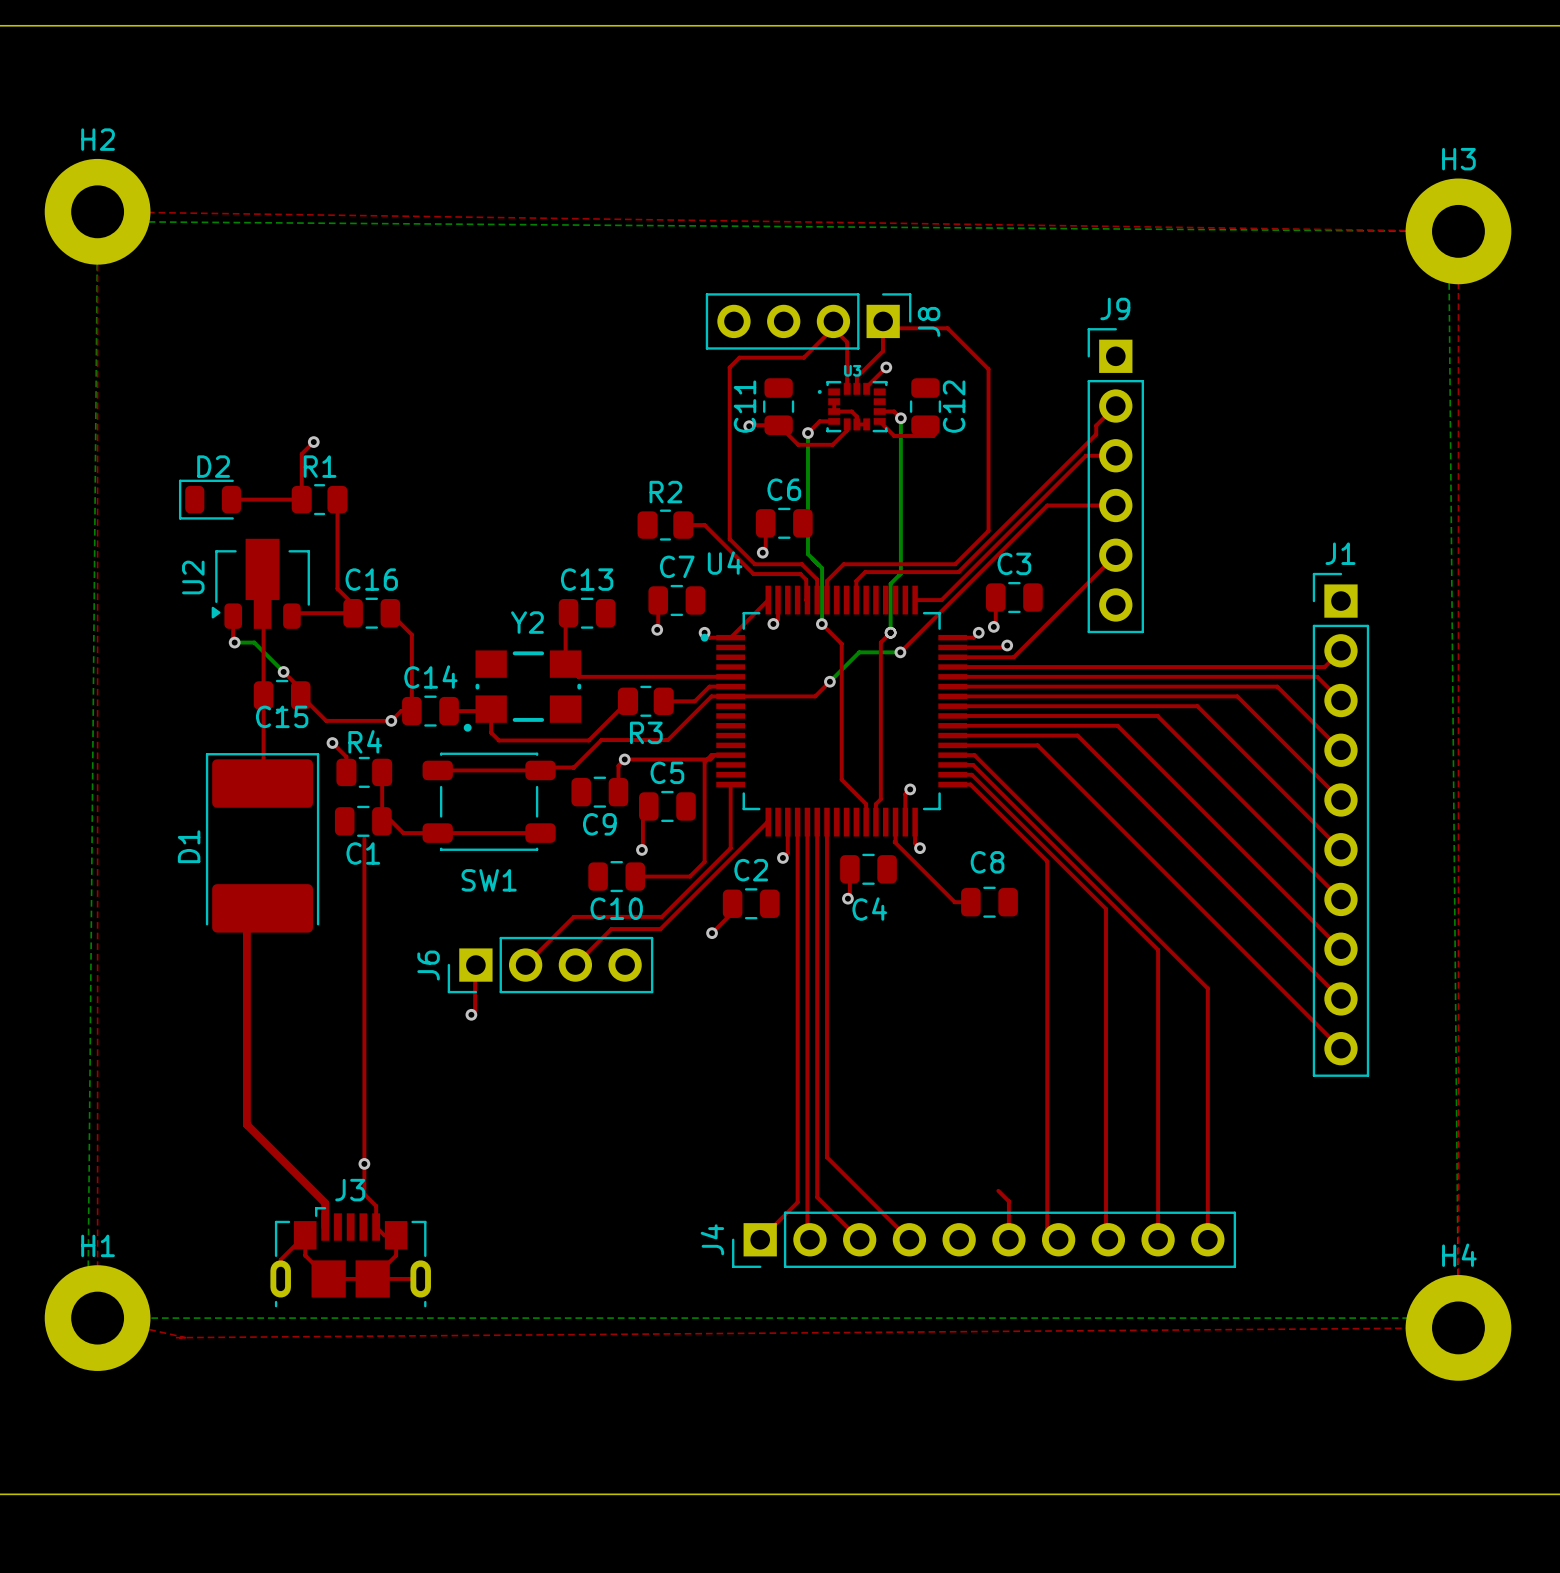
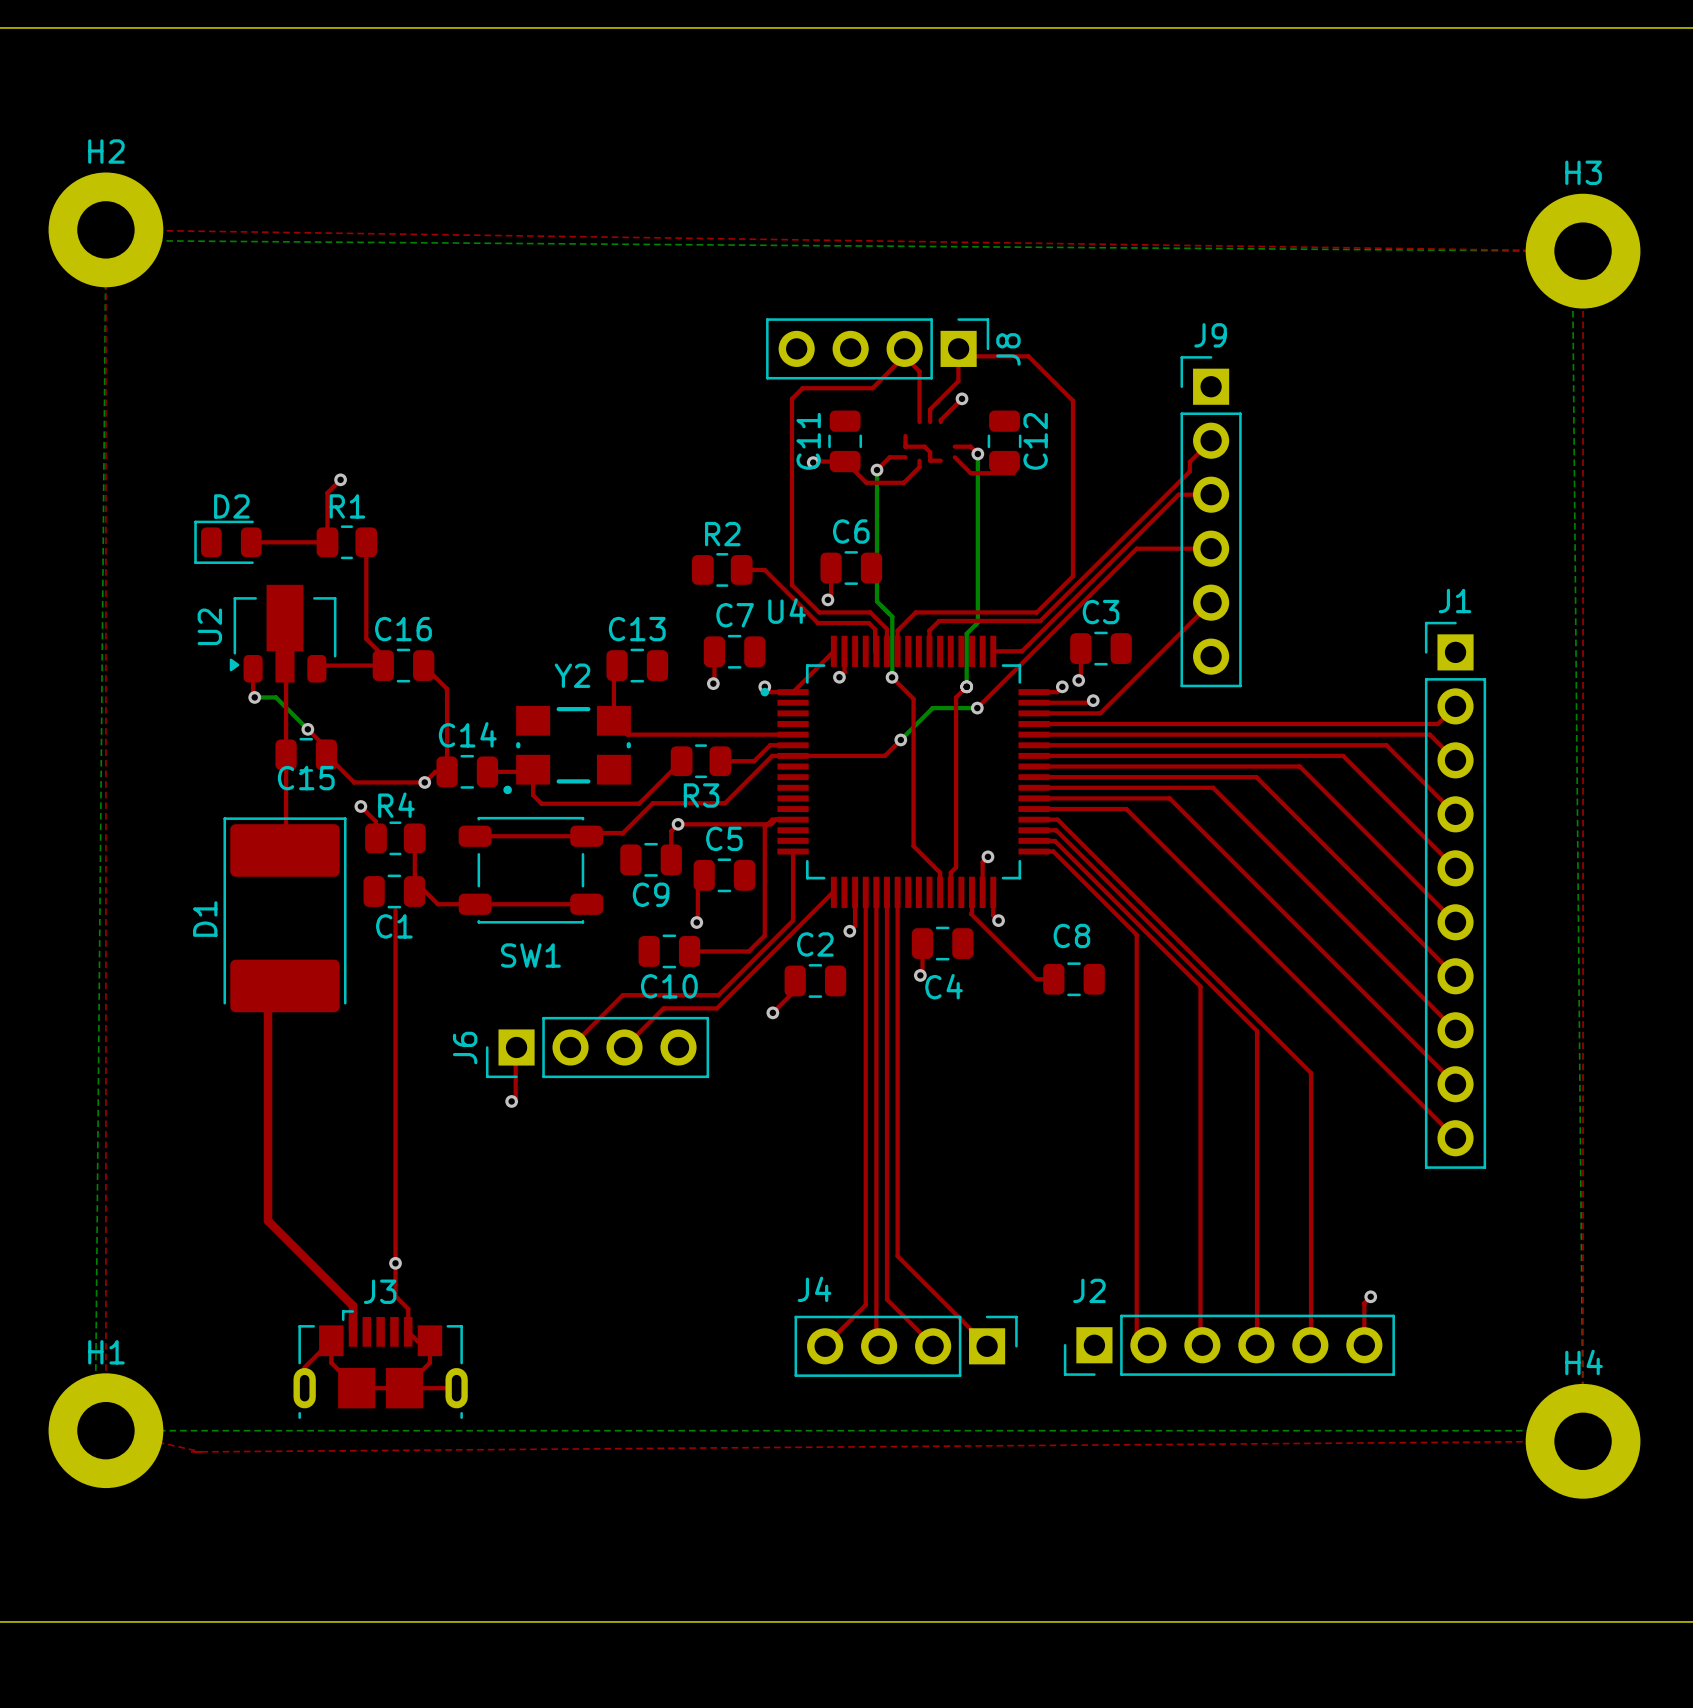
U3: (852, 406) -> none
top track: (998, 1190) (1008, 1201) (1008, 1239) -> none
via: none -> (1370, 1296)
top track: none -> (1371, 1296) (1364, 1303) (1364, 1345)
J4 footprint: [732, 1211, 1237, 1268] -> [794, 1315, 1018, 1377]
J4 name position: J4 (712, 1239) -> J4 (814, 1289)
J2: none -> (1229, 1345)

